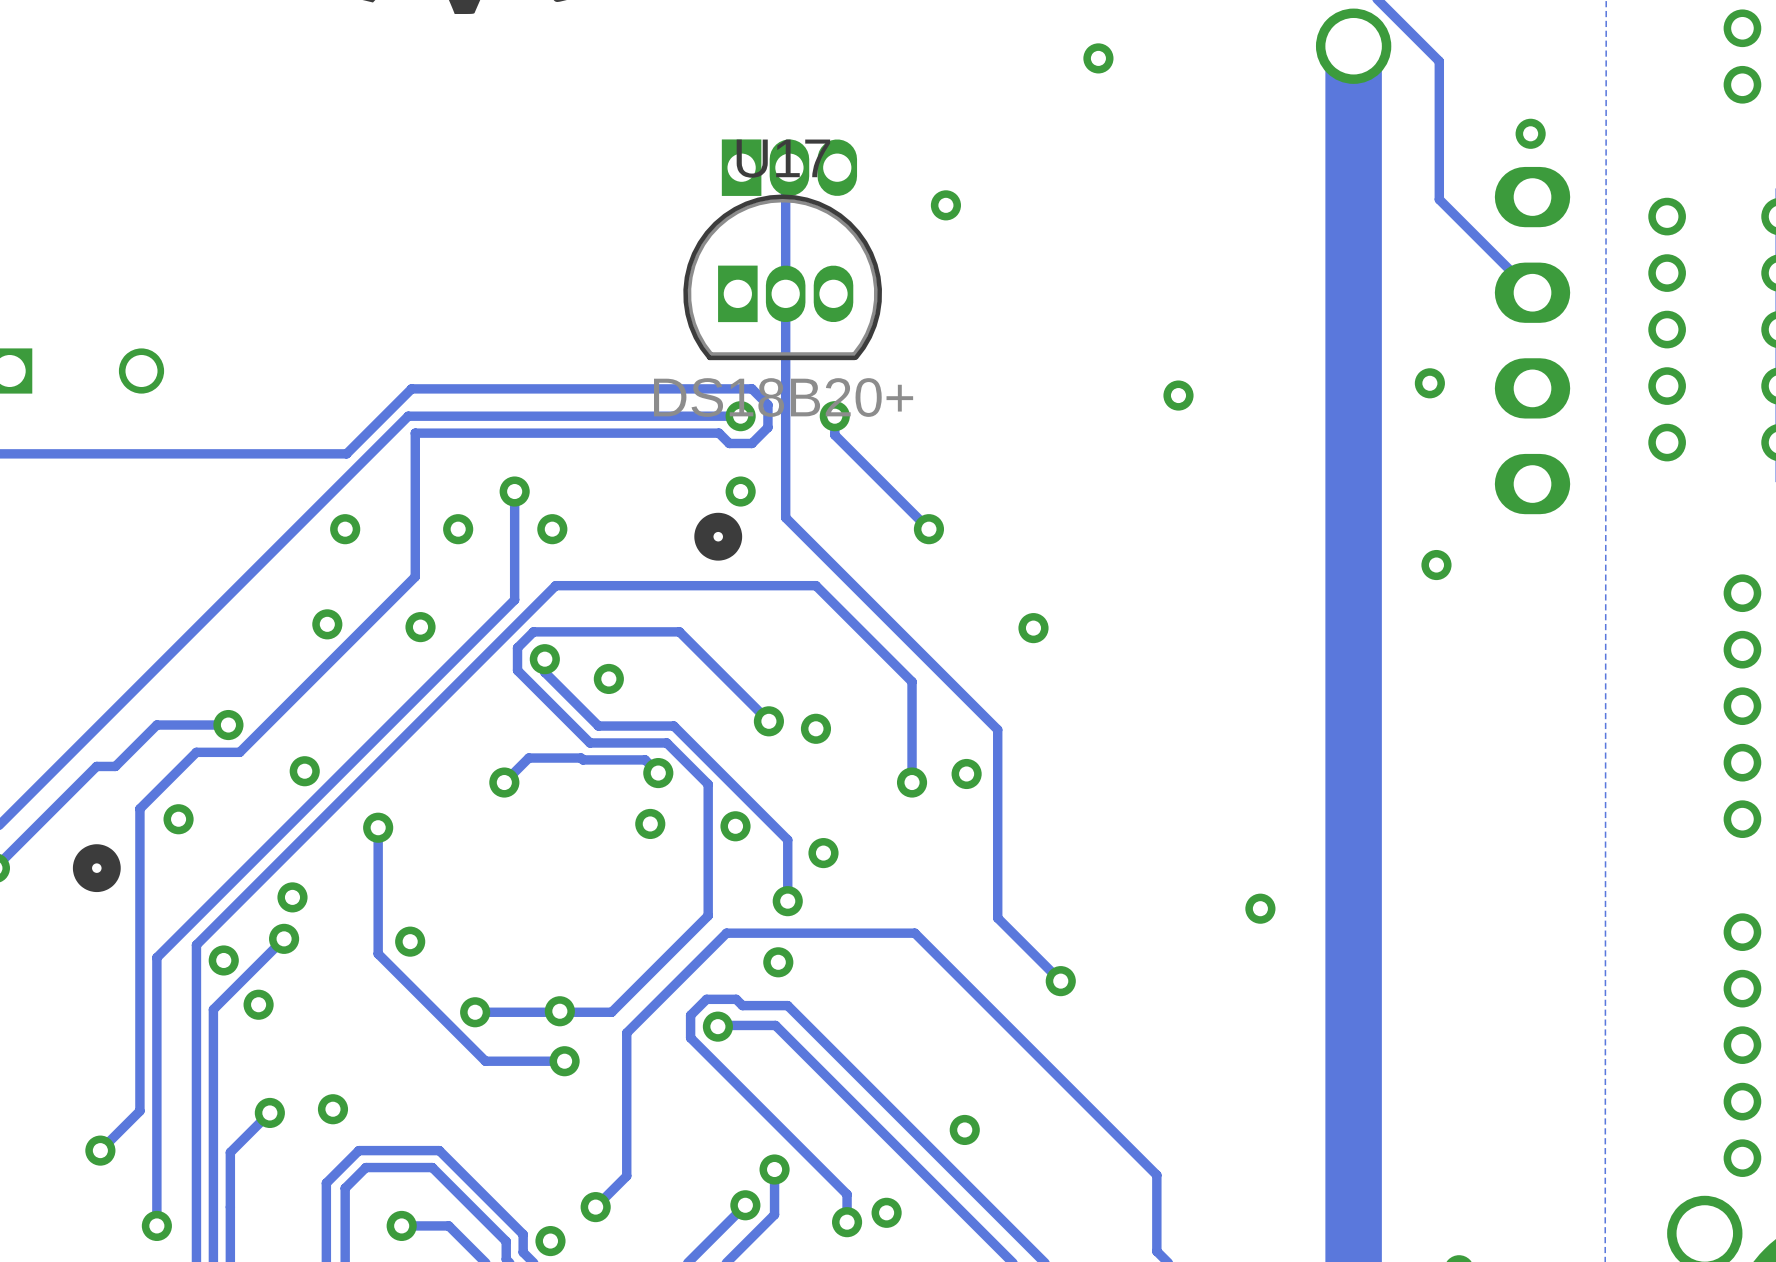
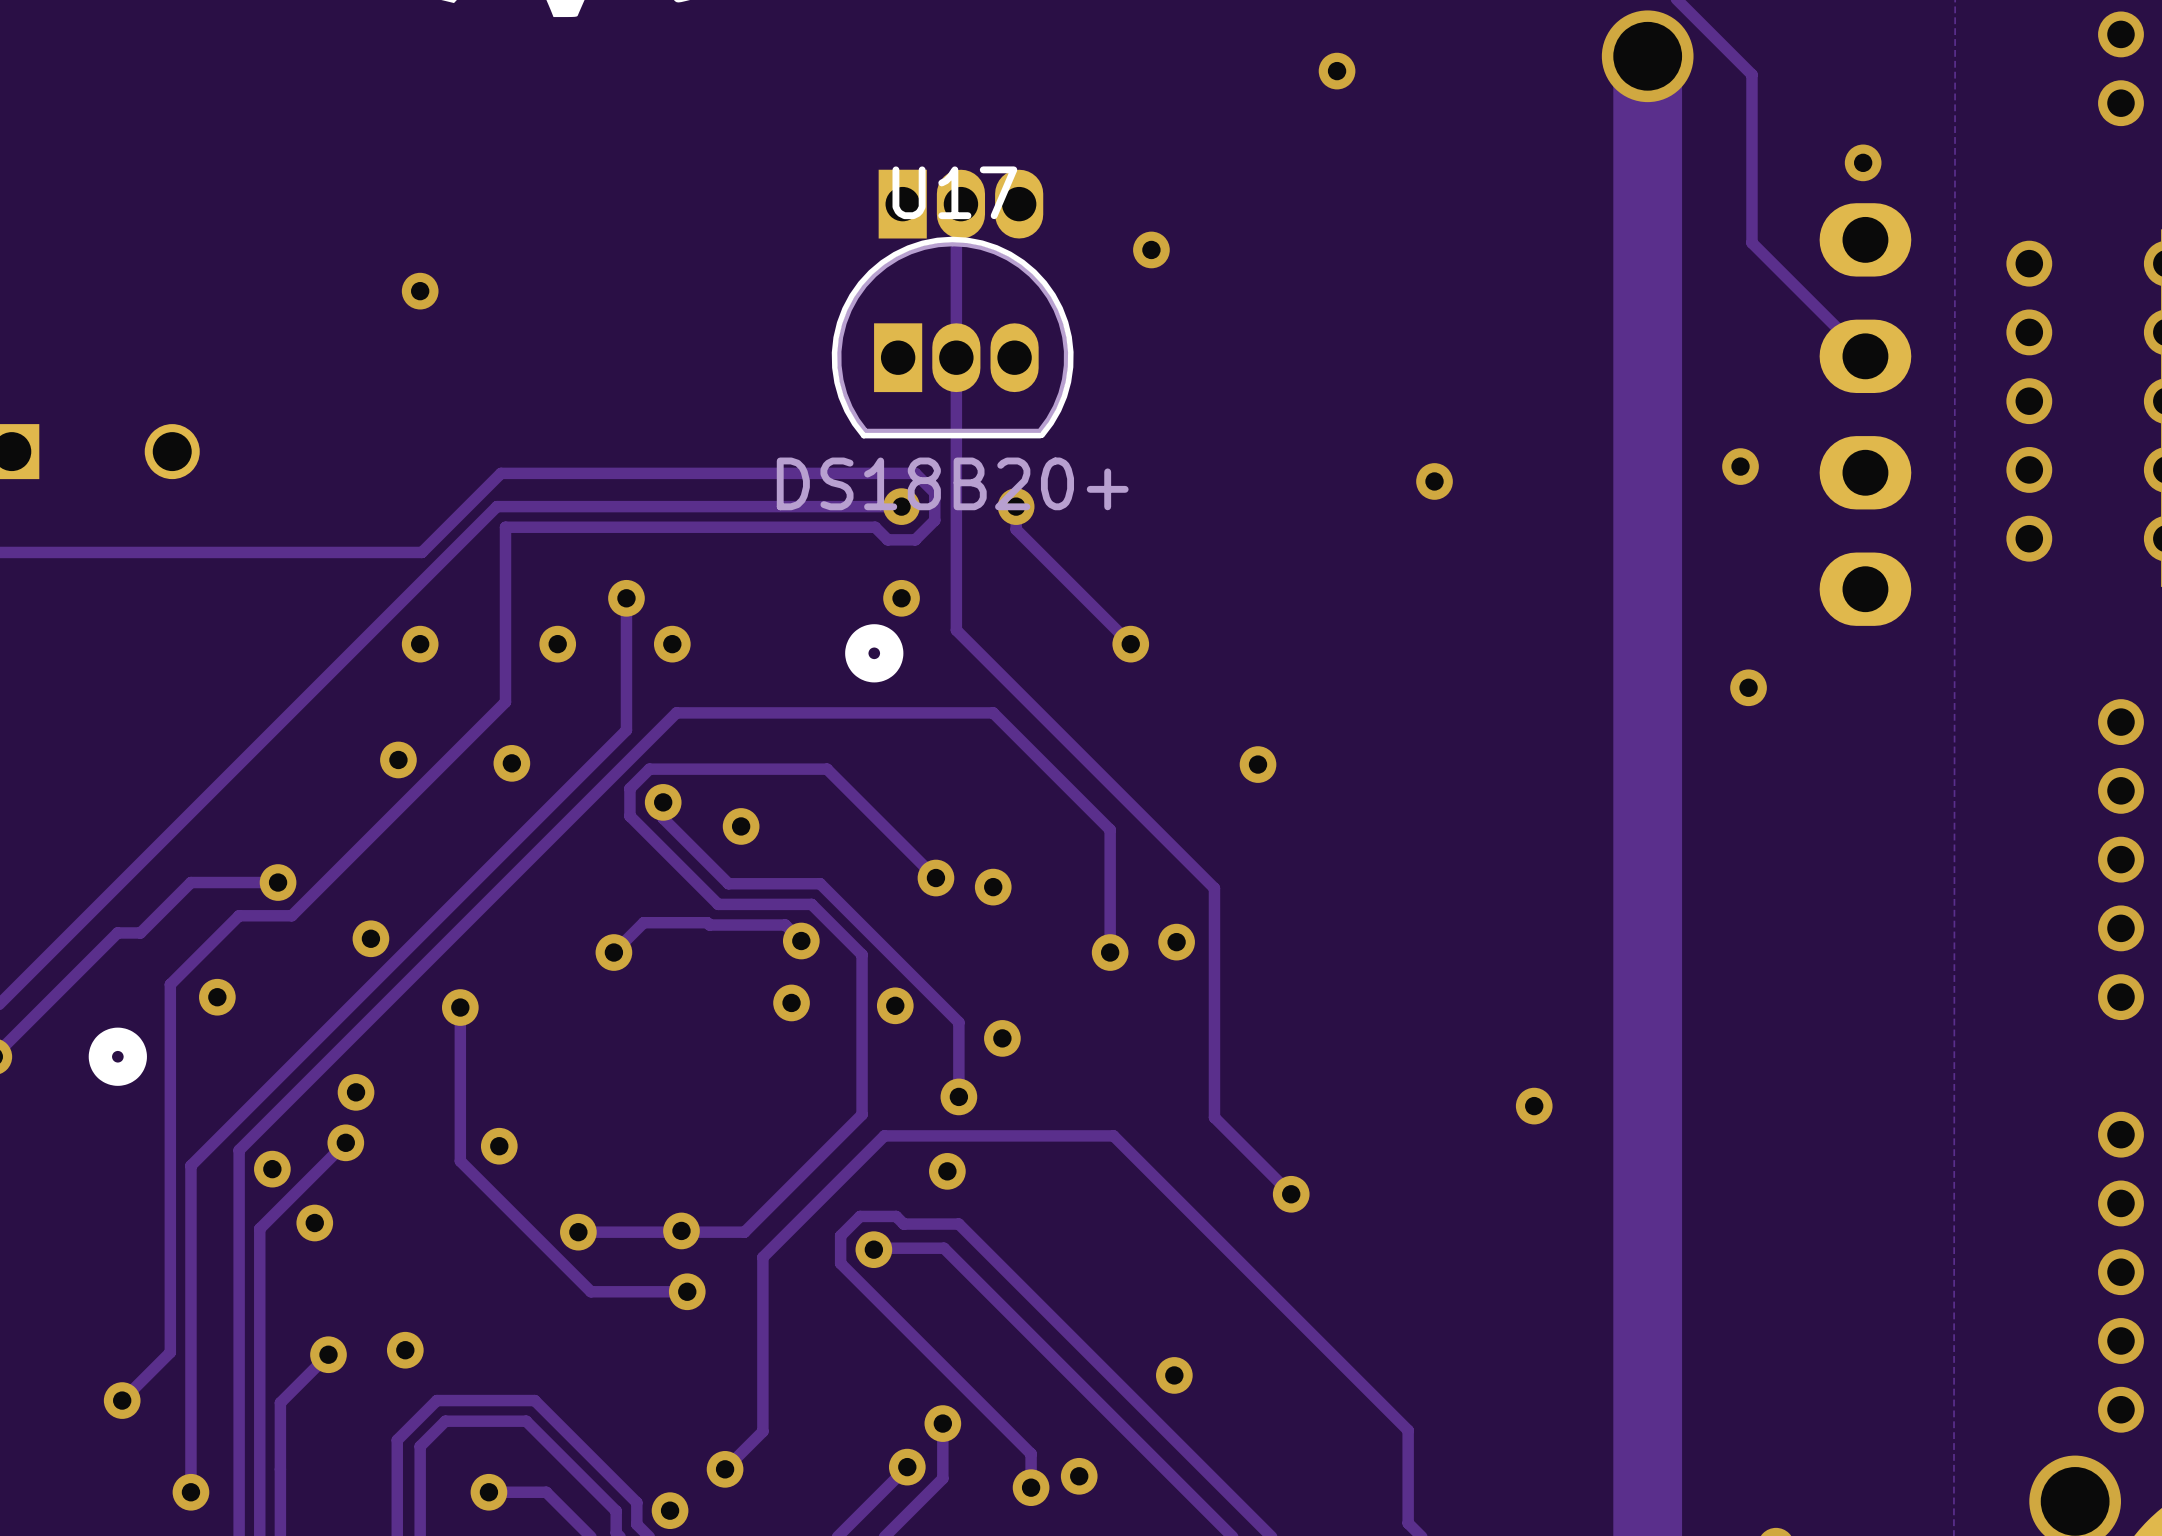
via: none -> (420, 291)

